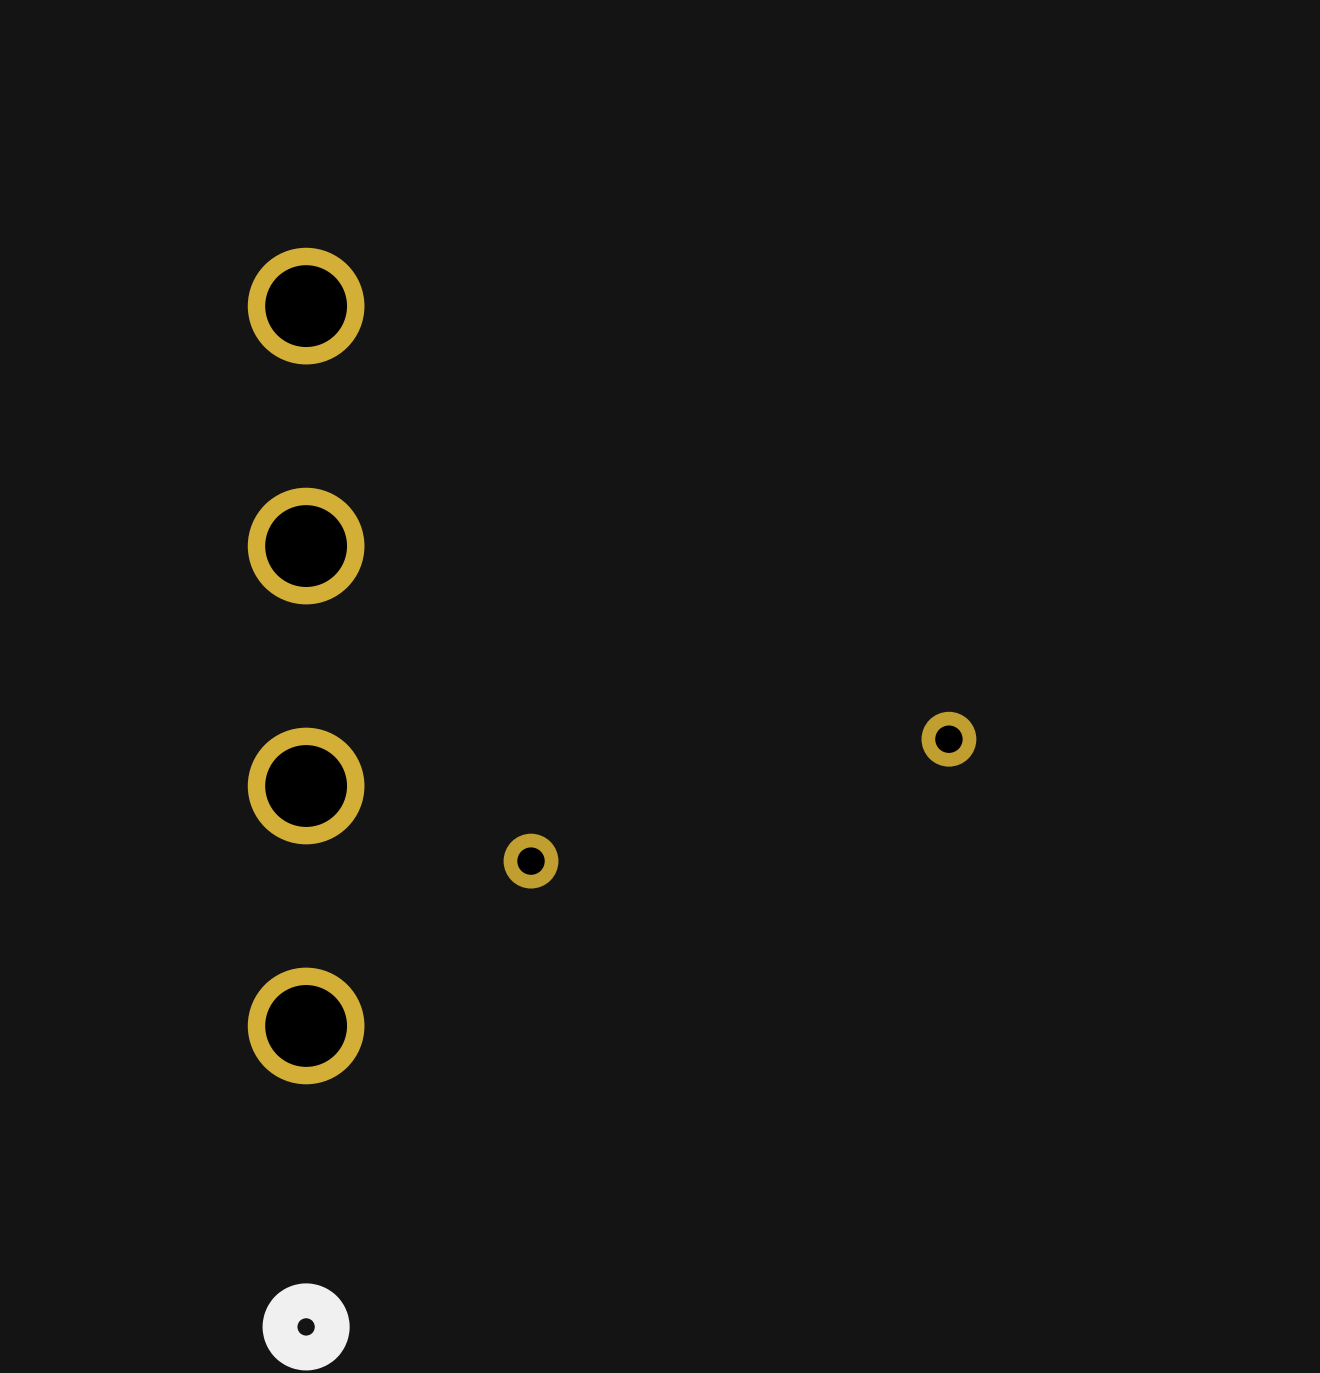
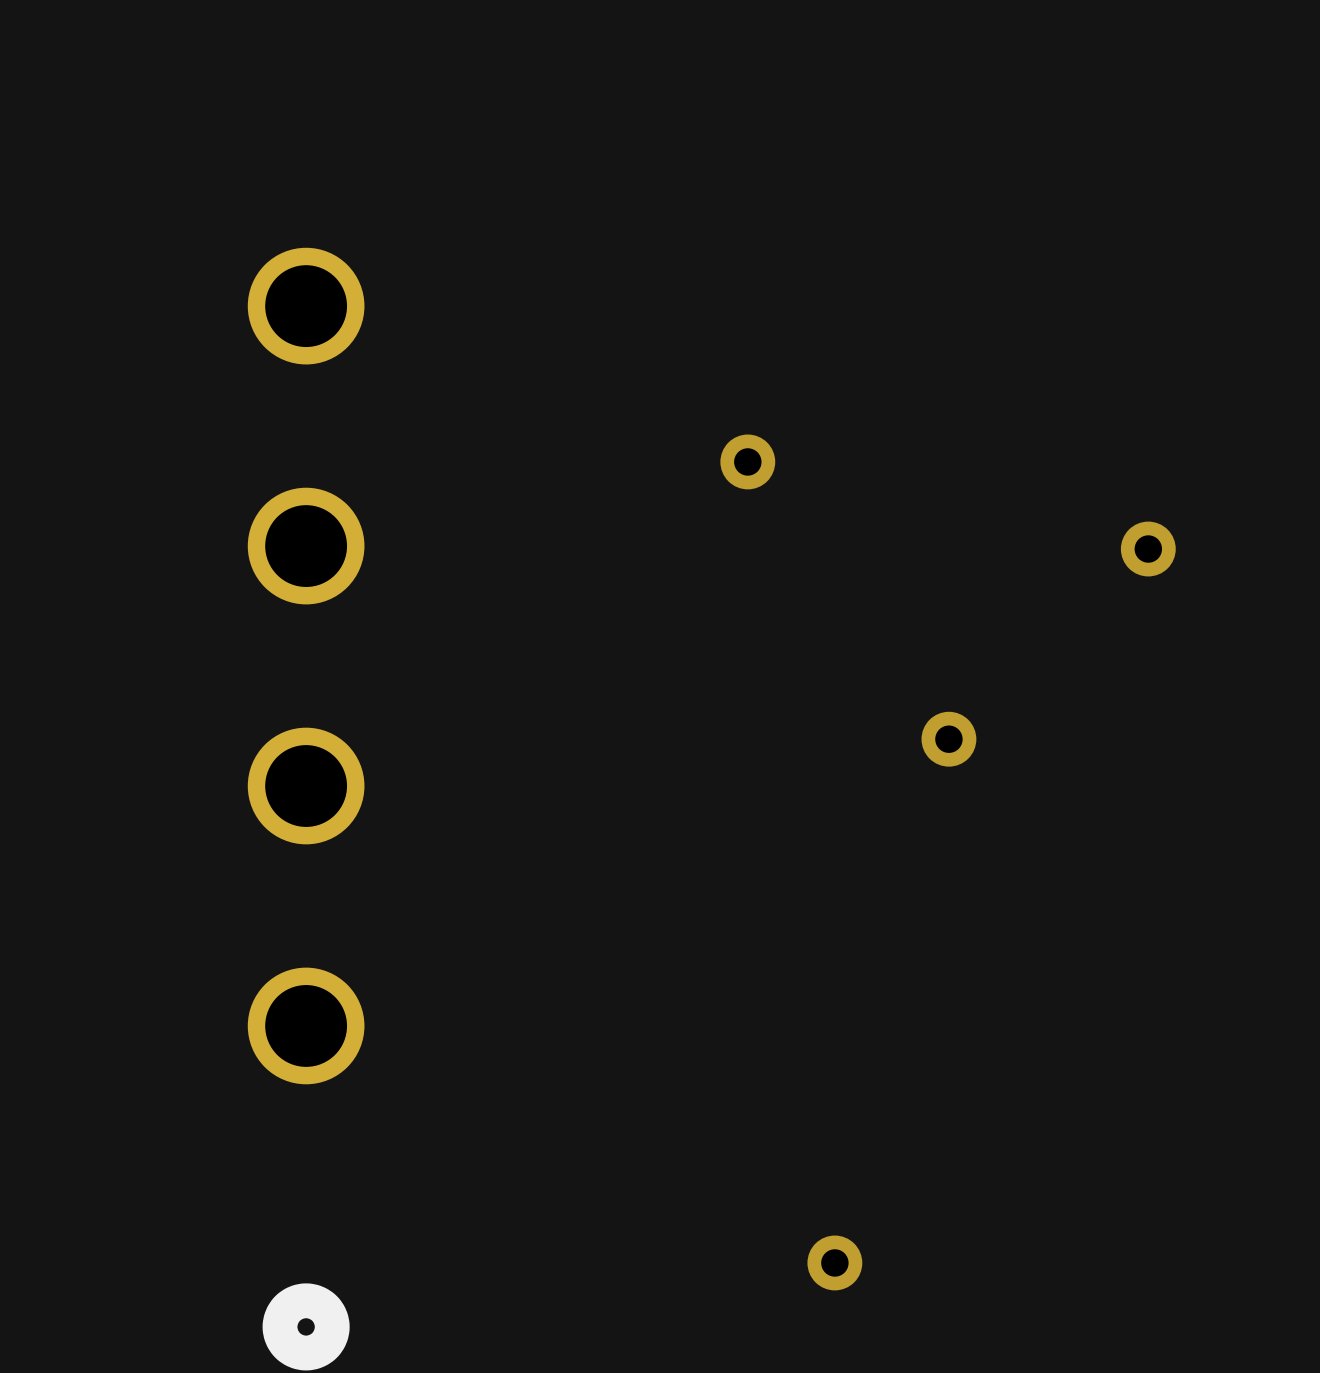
via: none -> (747, 461)
via: none -> (1148, 549)
via: (531, 861) -> none
via: none -> (834, 1262)

